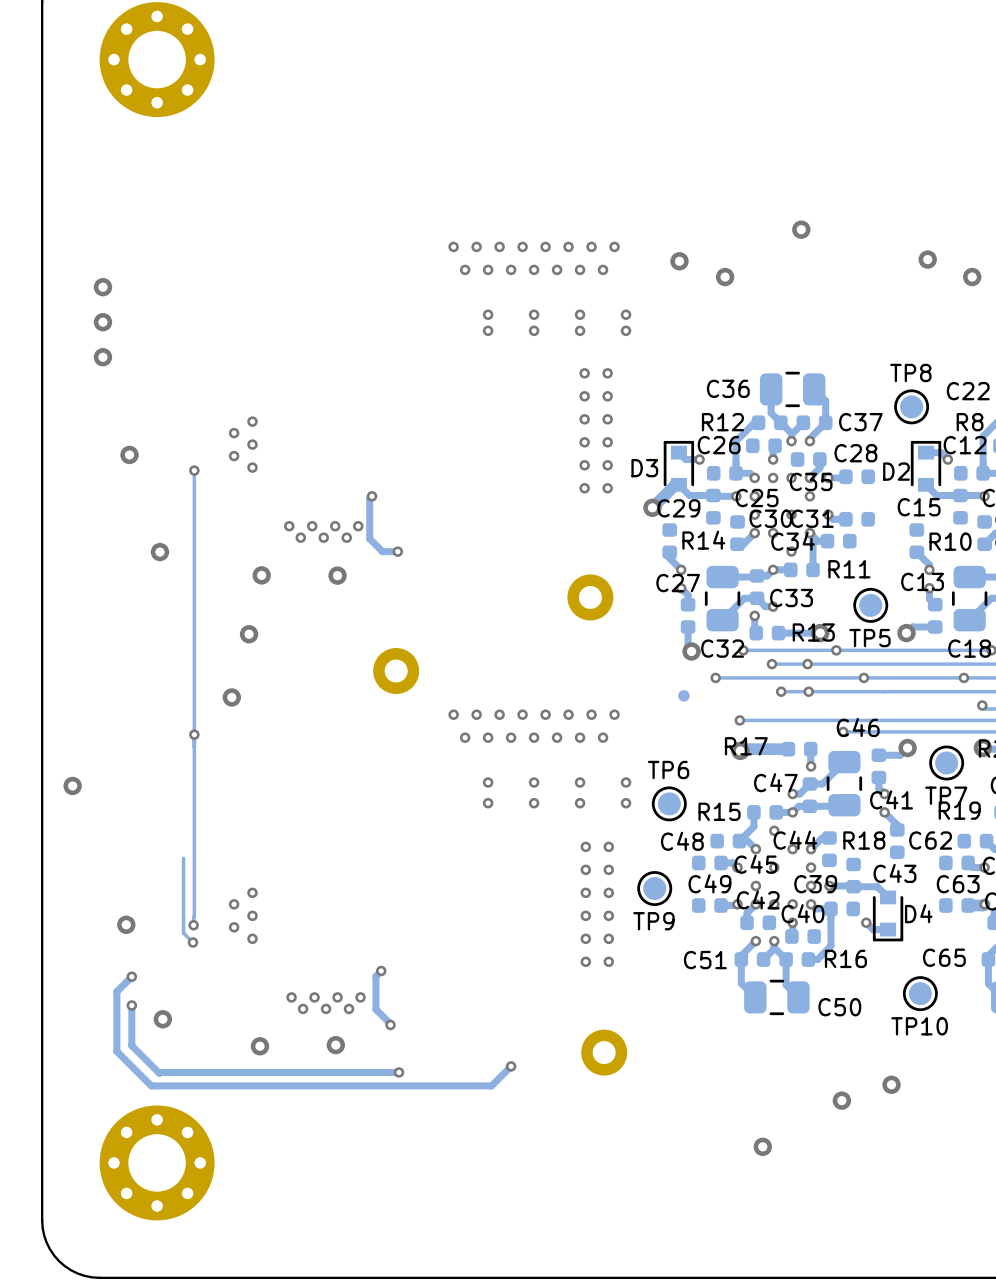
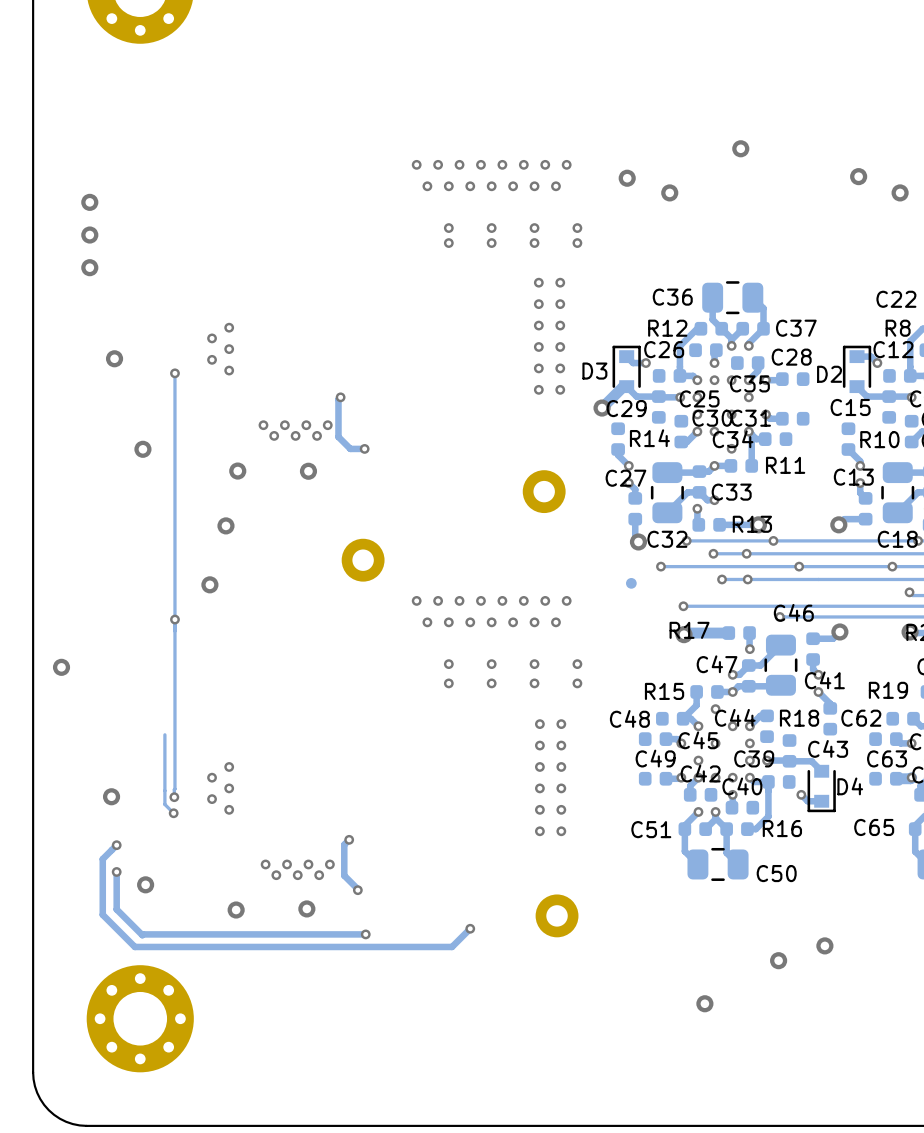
TP8: (911, 406) -> none
TP5: (870, 605) -> none
TP7: (946, 763) -> none
TP6: (669, 803) -> none
TP9: (654, 888) -> none
TP10: (920, 993) -> none

